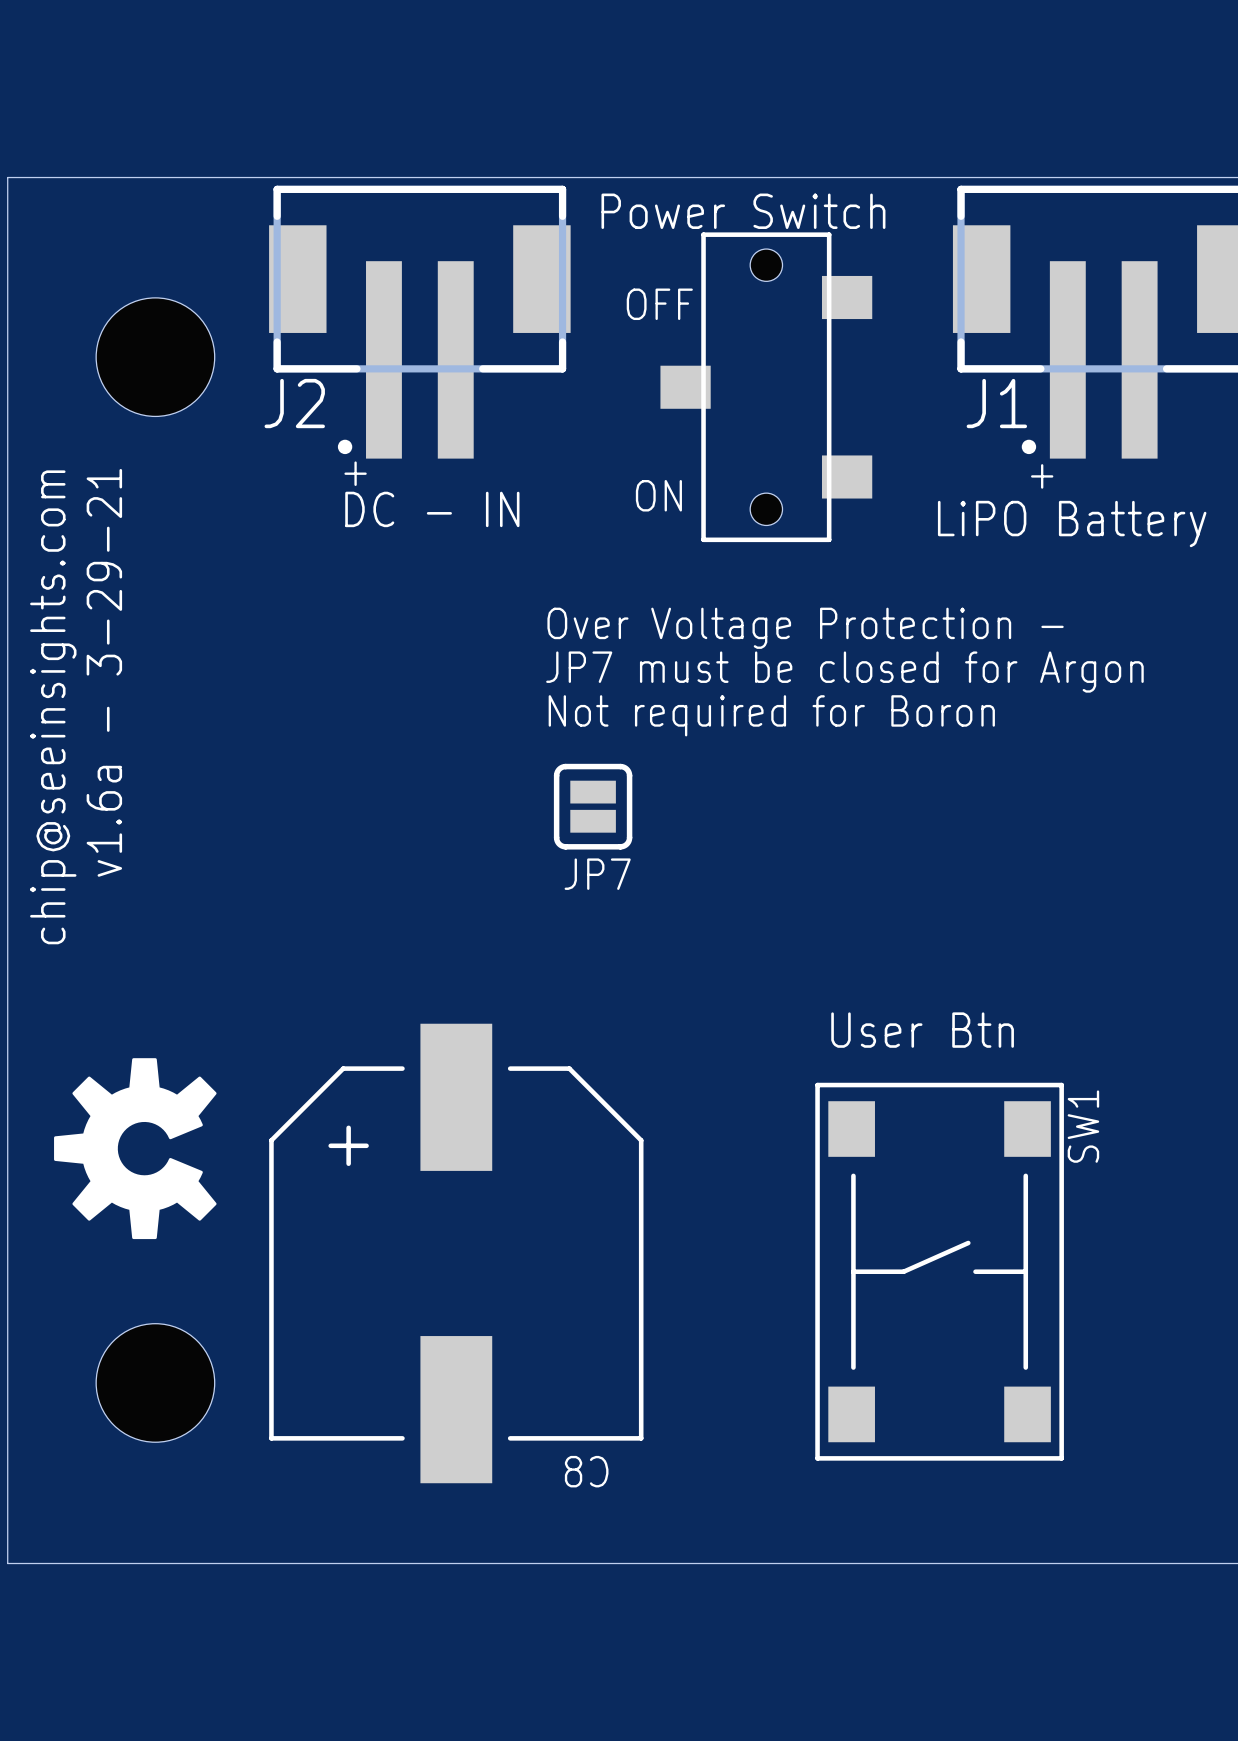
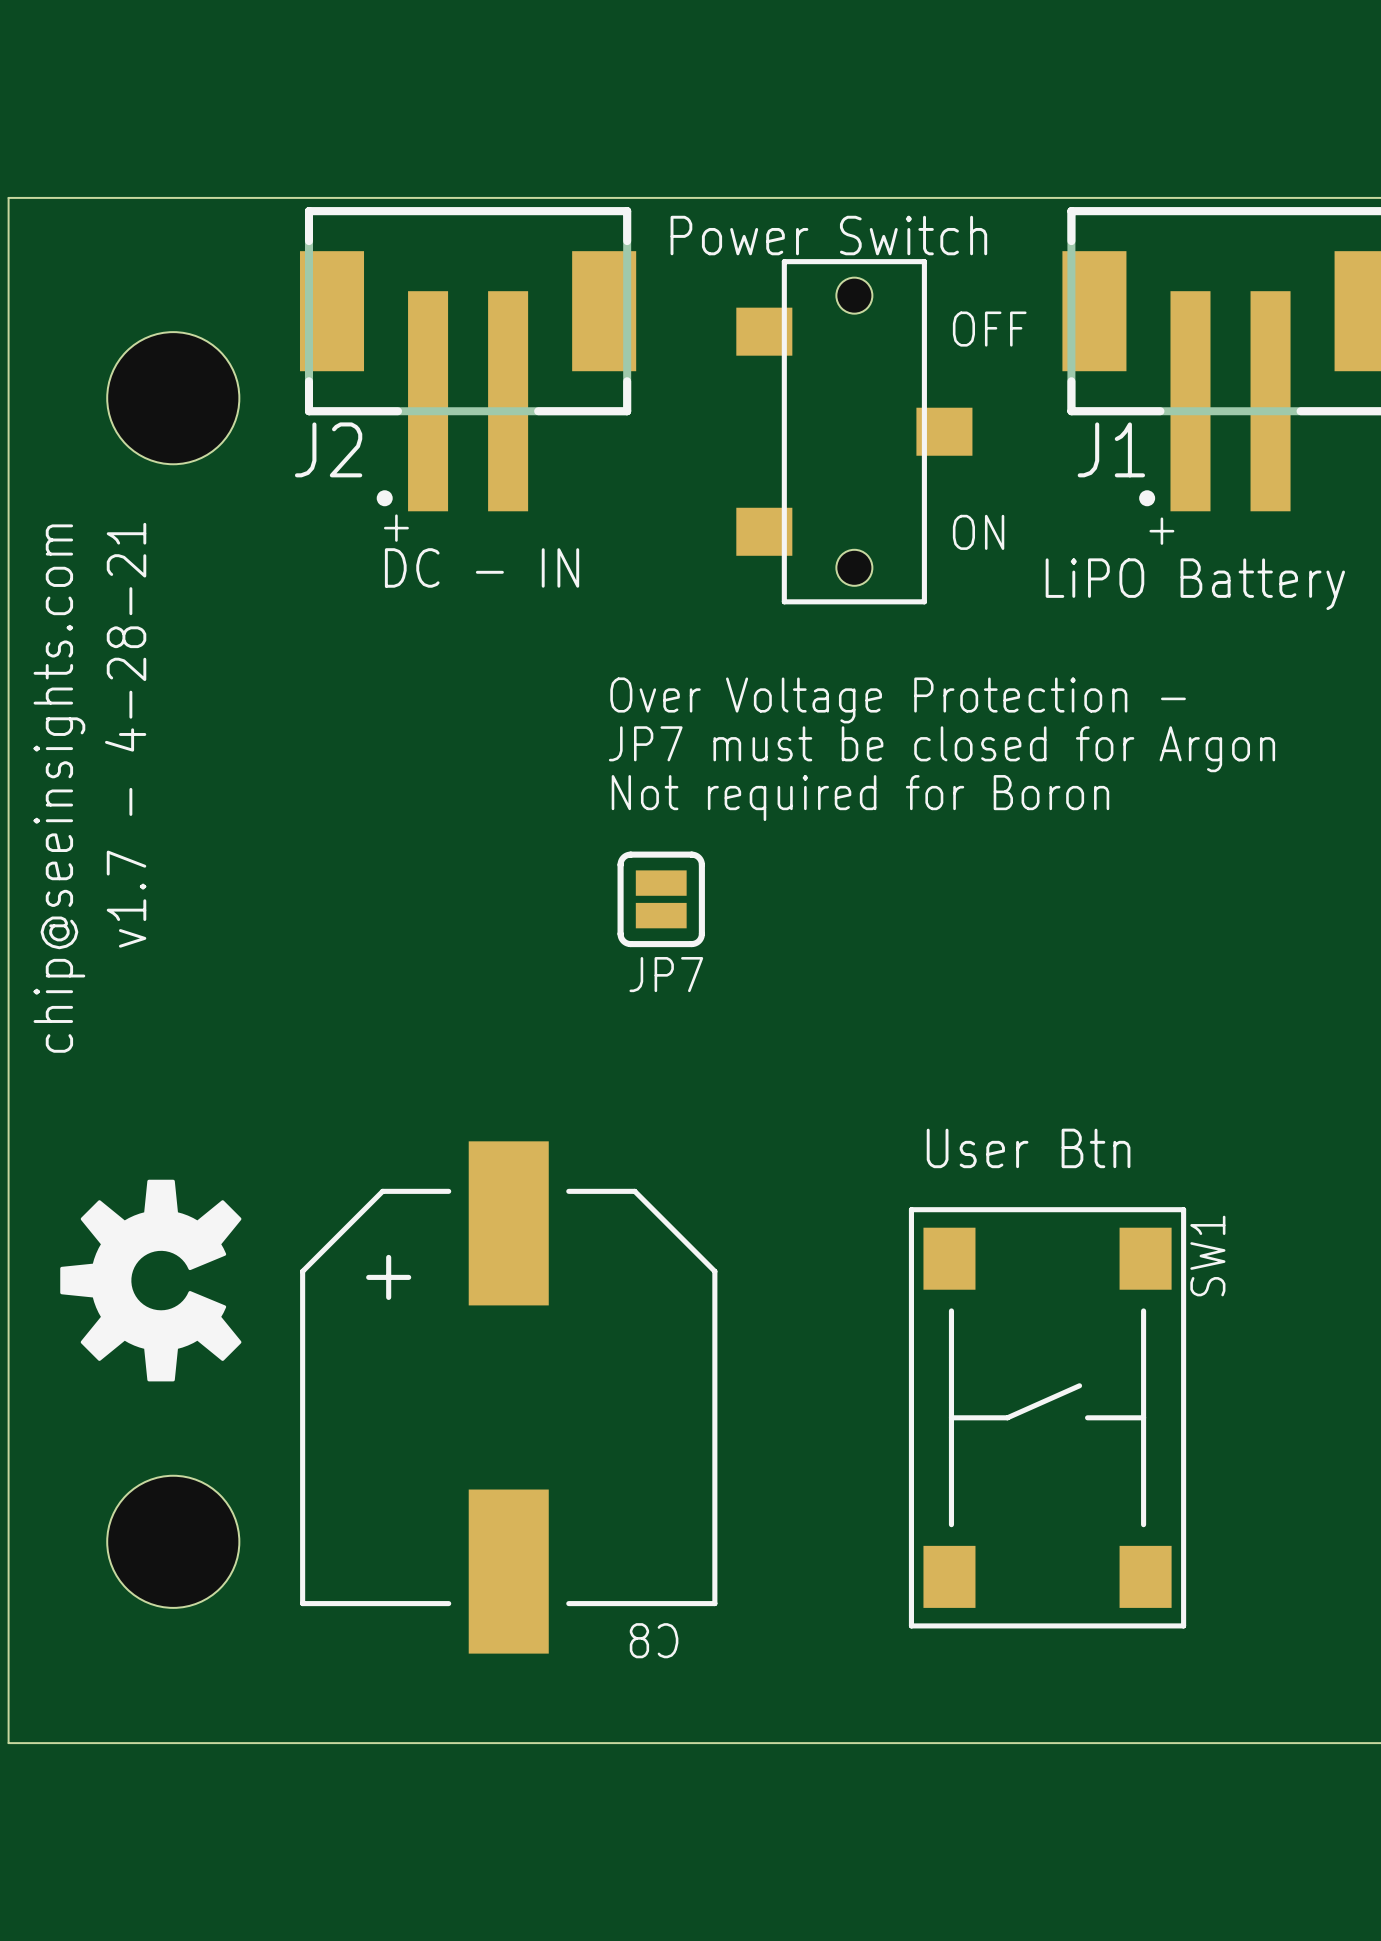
text position: OFF (659, 304) -> OFF (989, 329)
part rotation: 0° (766, 387) -> 180° (854, 431)
text position: ON (658, 495) -> ON (978, 532)
text: v1.6a - 3-29-21 (104, 672) -> v1.7 - 4-28-21 (125, 735)

